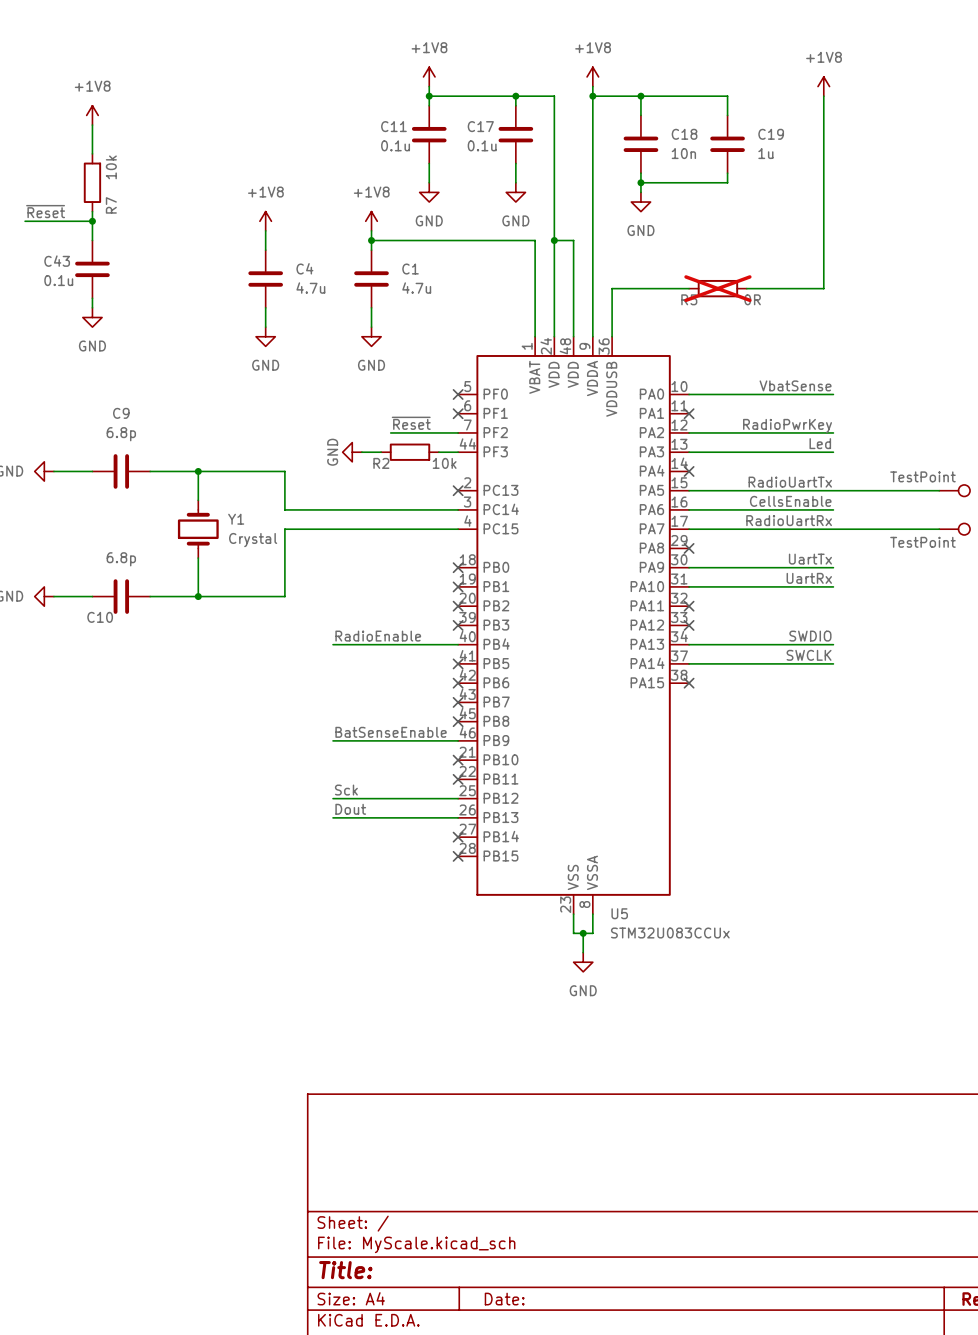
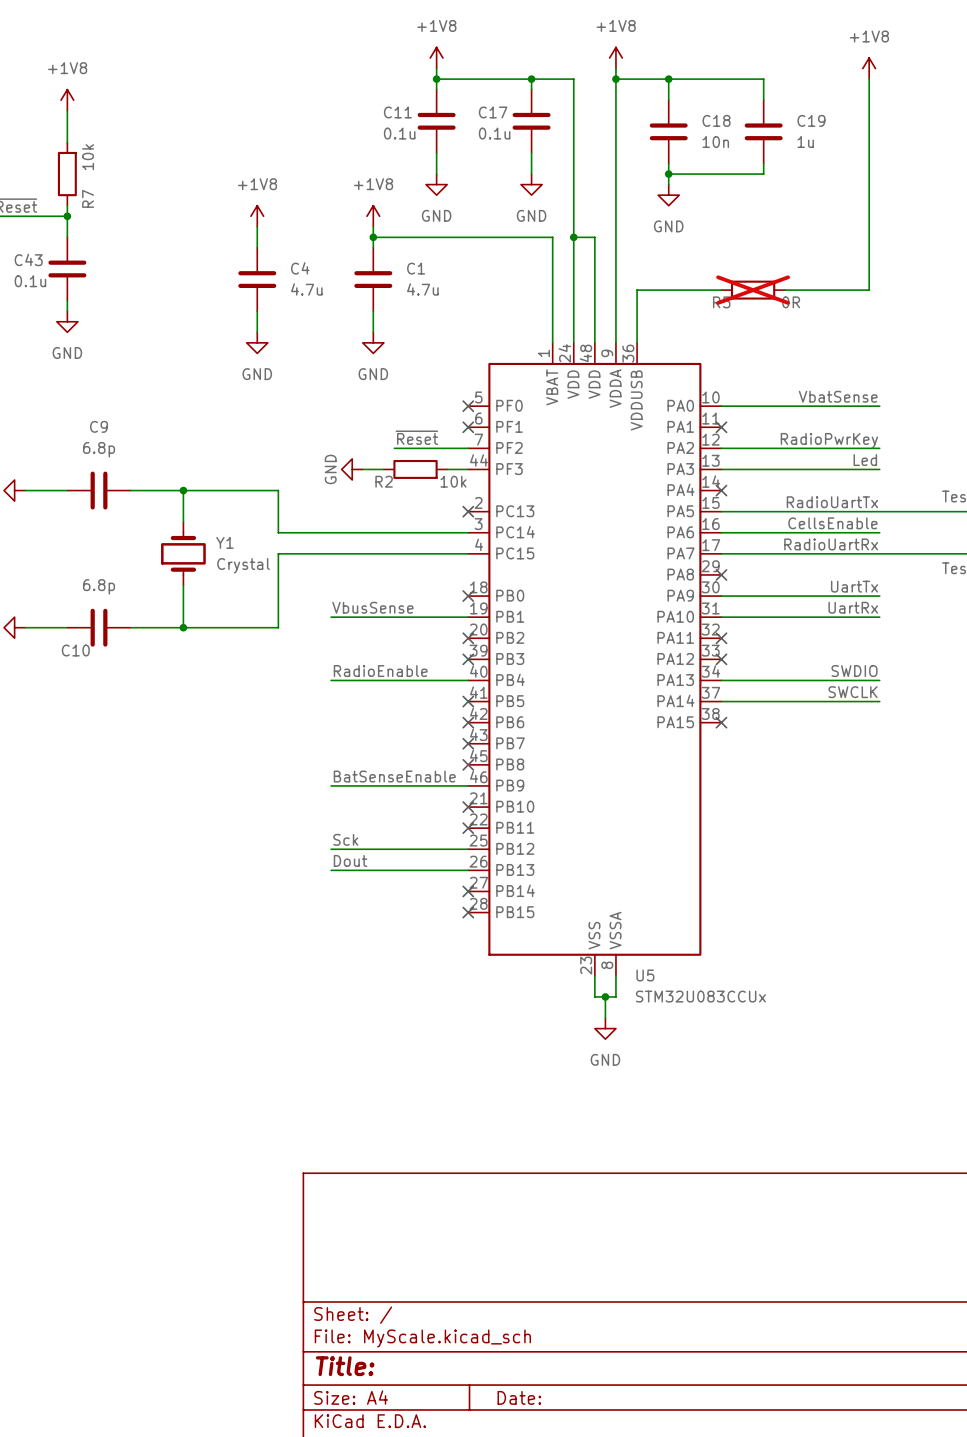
label: none -> VbusSense (372, 607)
wire: none -> (331, 617) (468, 617)
no-connect mark: (458, 586) -> none

